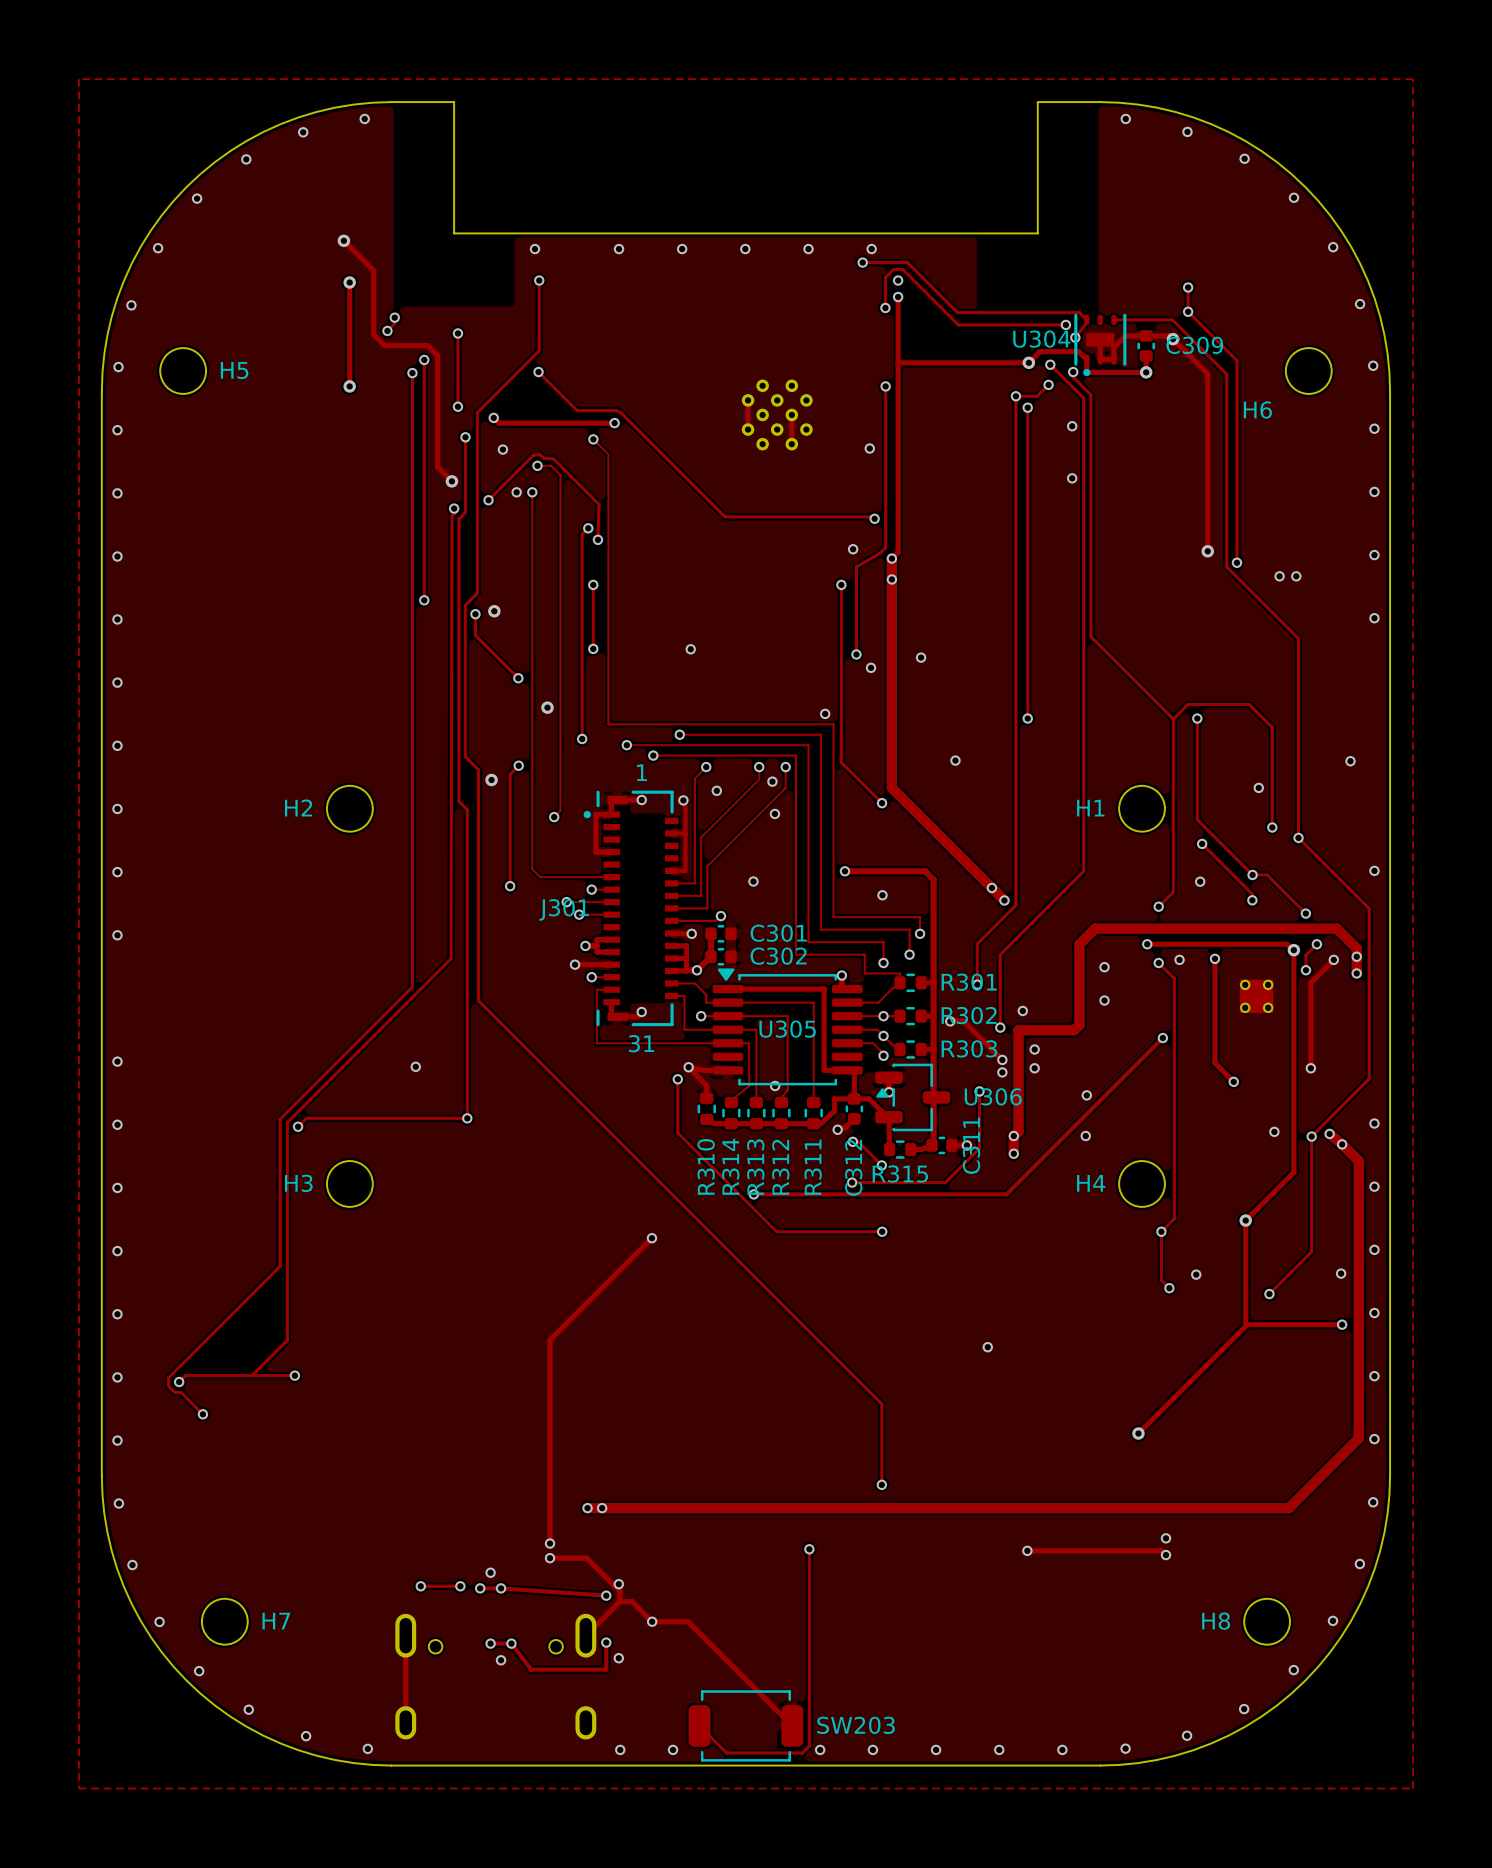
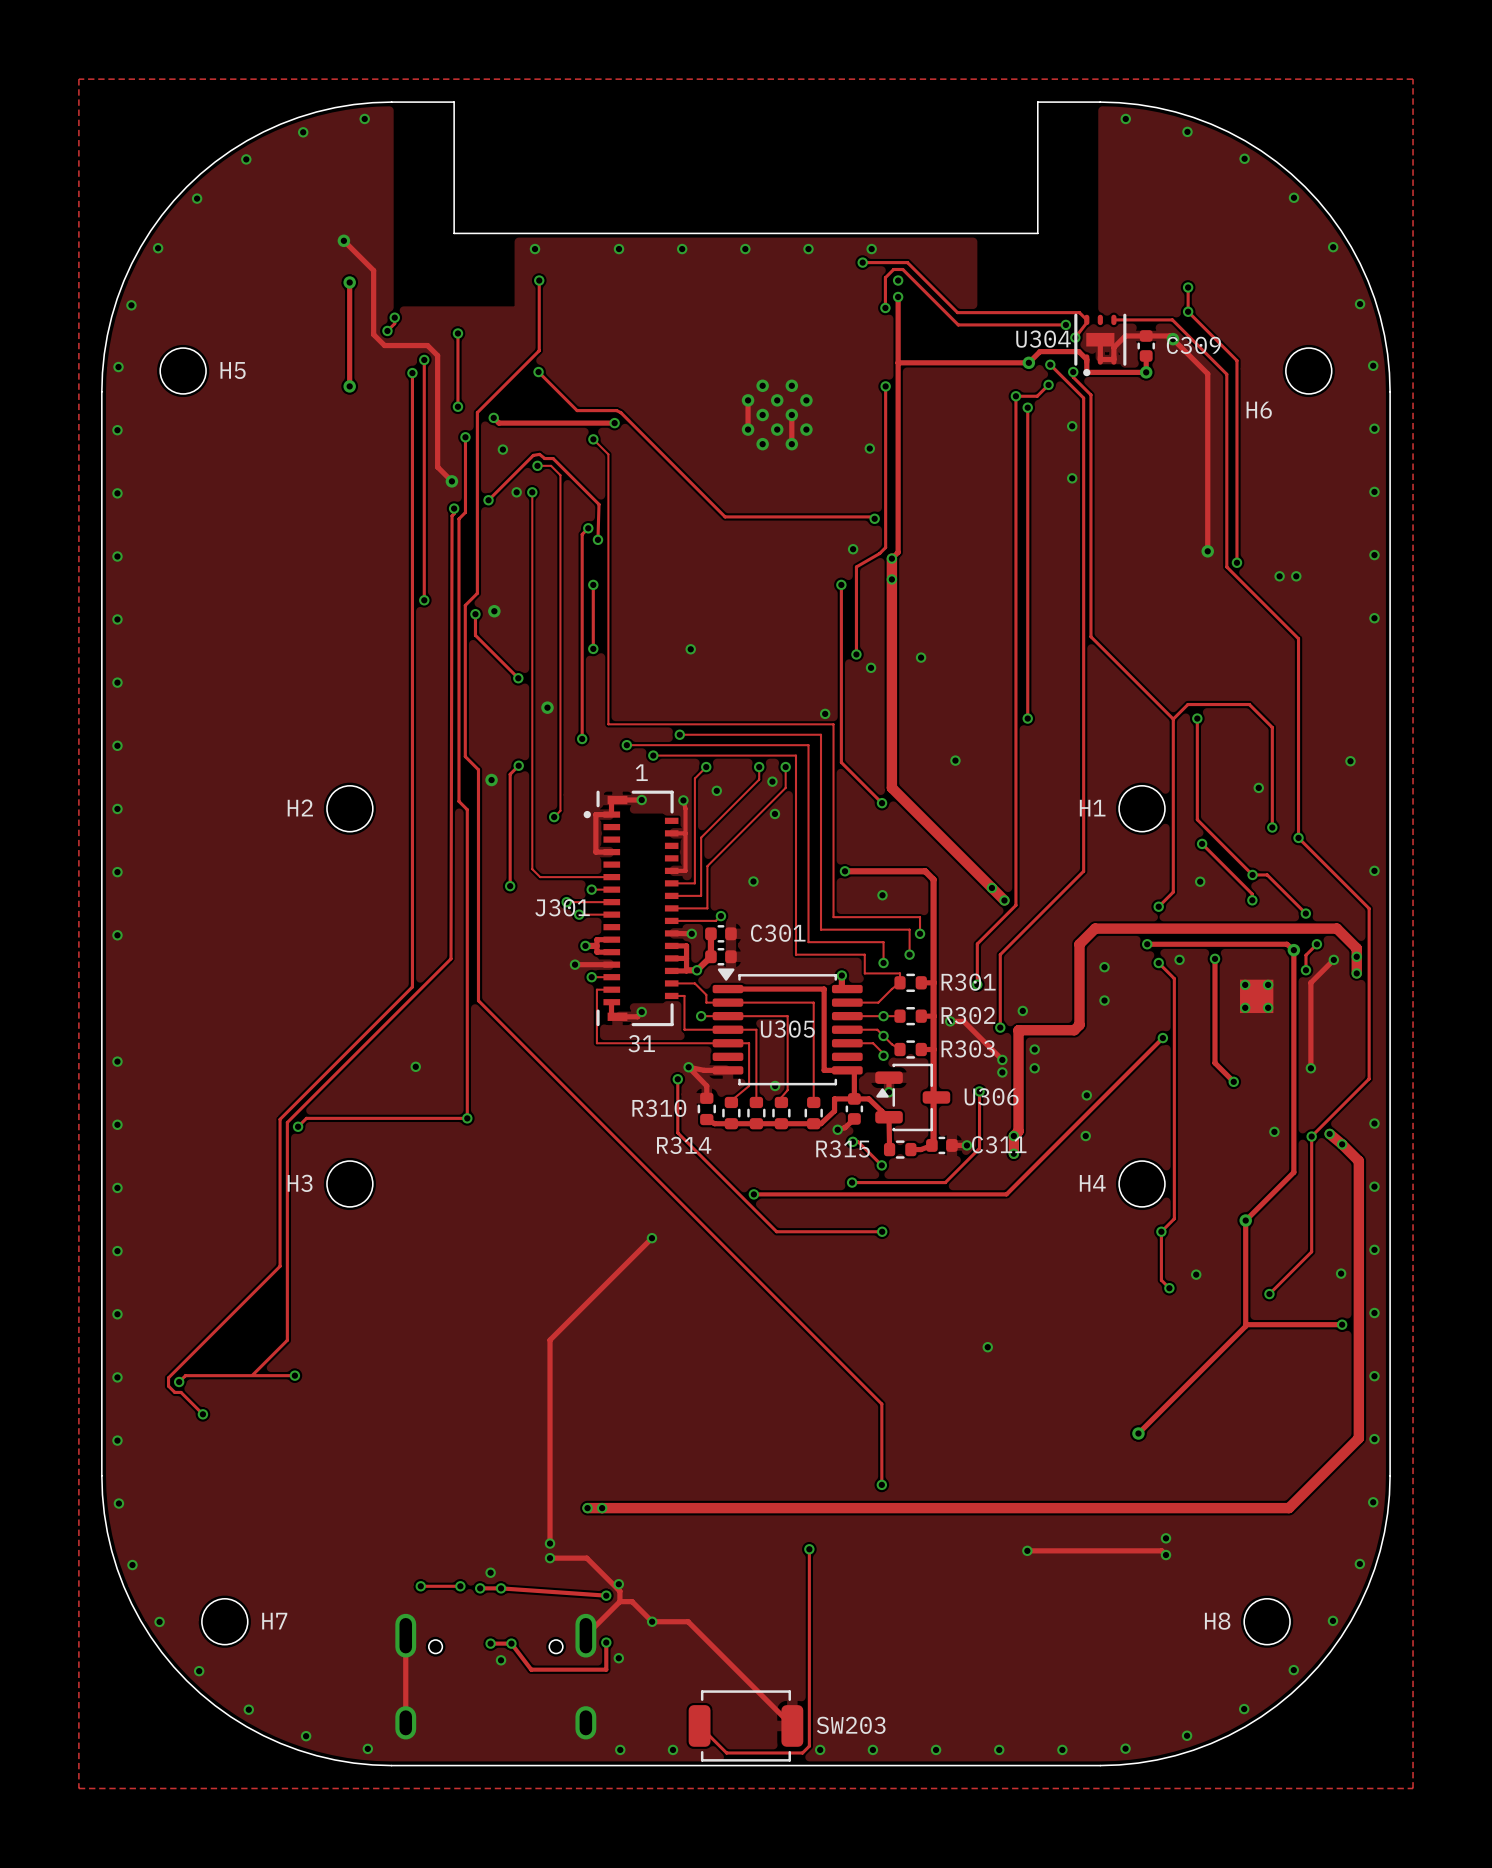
C302 name: C302 (778, 956) -> none
C311 name rotation: 0° (971, 1145) -> 90° clockwise (999, 1144)
R310 name rotation: 0° (706, 1166) -> 90° clockwise (659, 1108)
R310 name position: R310 (706, 1166) -> R310 (659, 1108)
R314 name rotation: 0° (730, 1166) -> 90° clockwise (684, 1145)
R313 name: R313 (755, 1167) -> none
R312 name: R312 (780, 1167) -> none
R311 name: R311 (813, 1167) -> none
C312 name: C312 (853, 1167) -> none
R315 name position: R315 (900, 1173) -> R315 (843, 1148)

